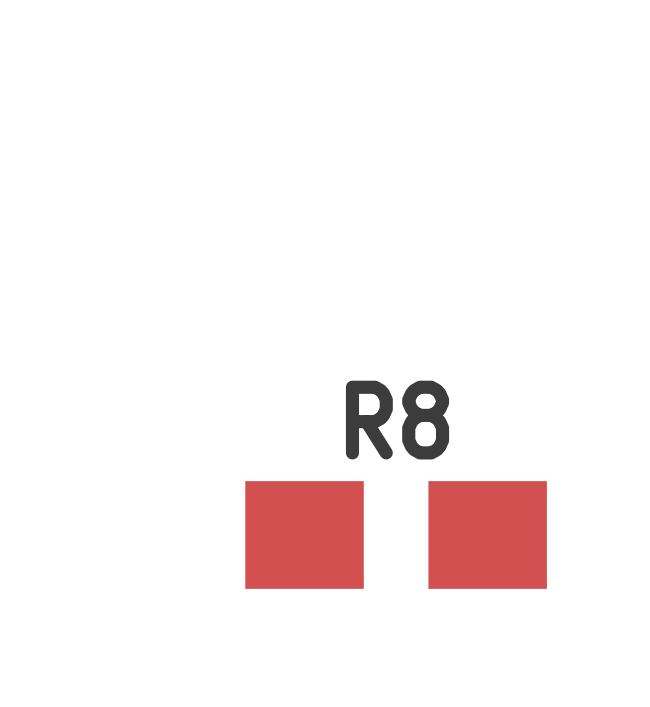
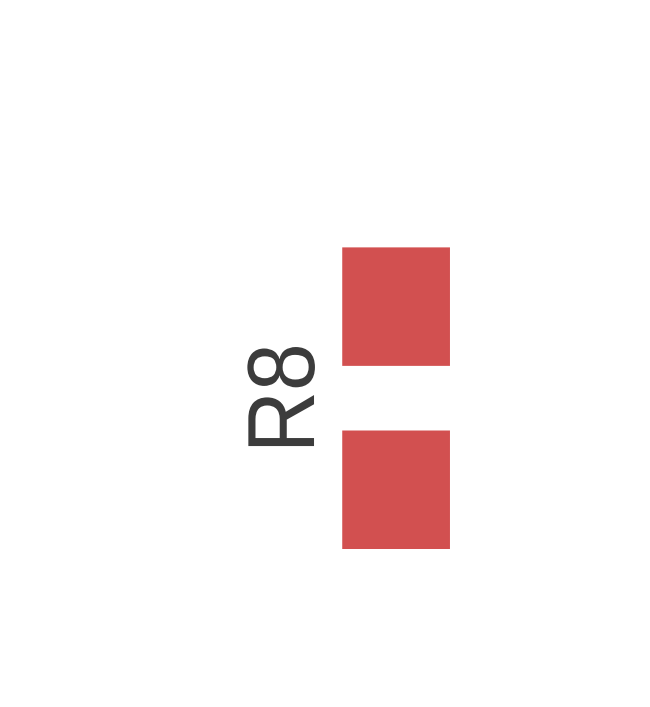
R8 rotation: 0° (396, 534) -> 90° clockwise (396, 398)

